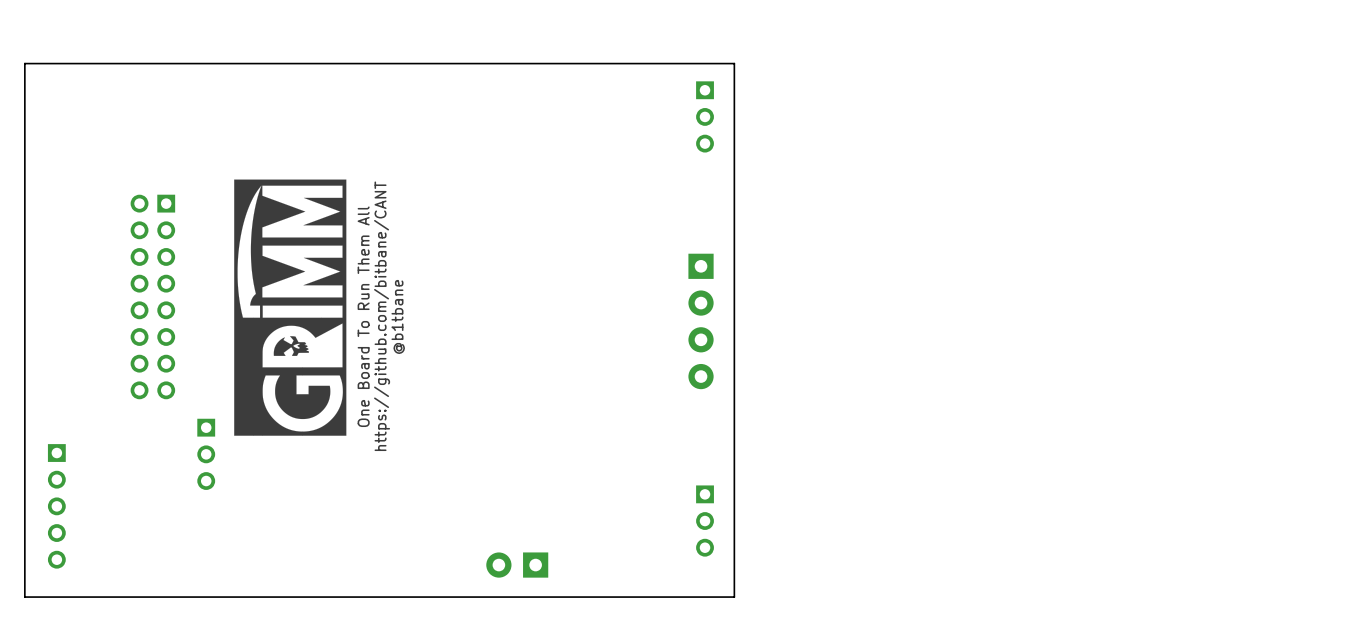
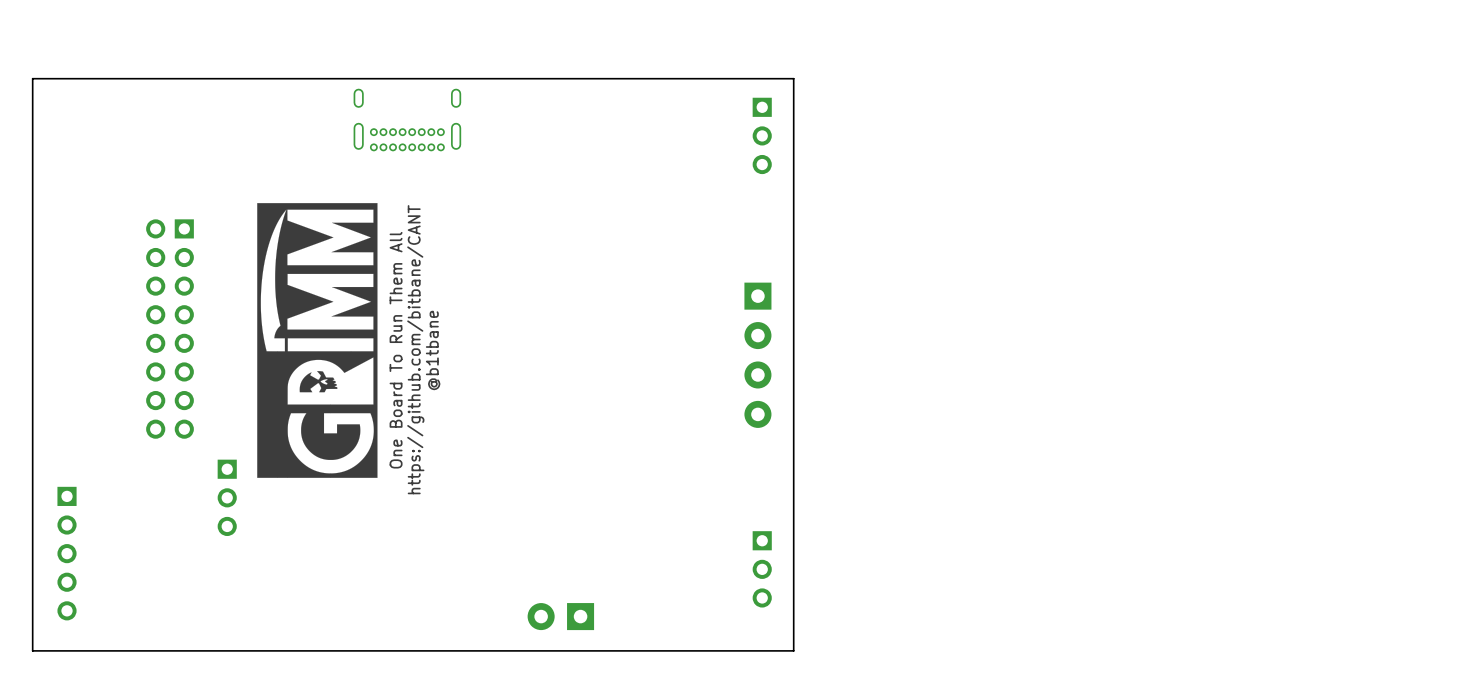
part: none -> (407, 119)

